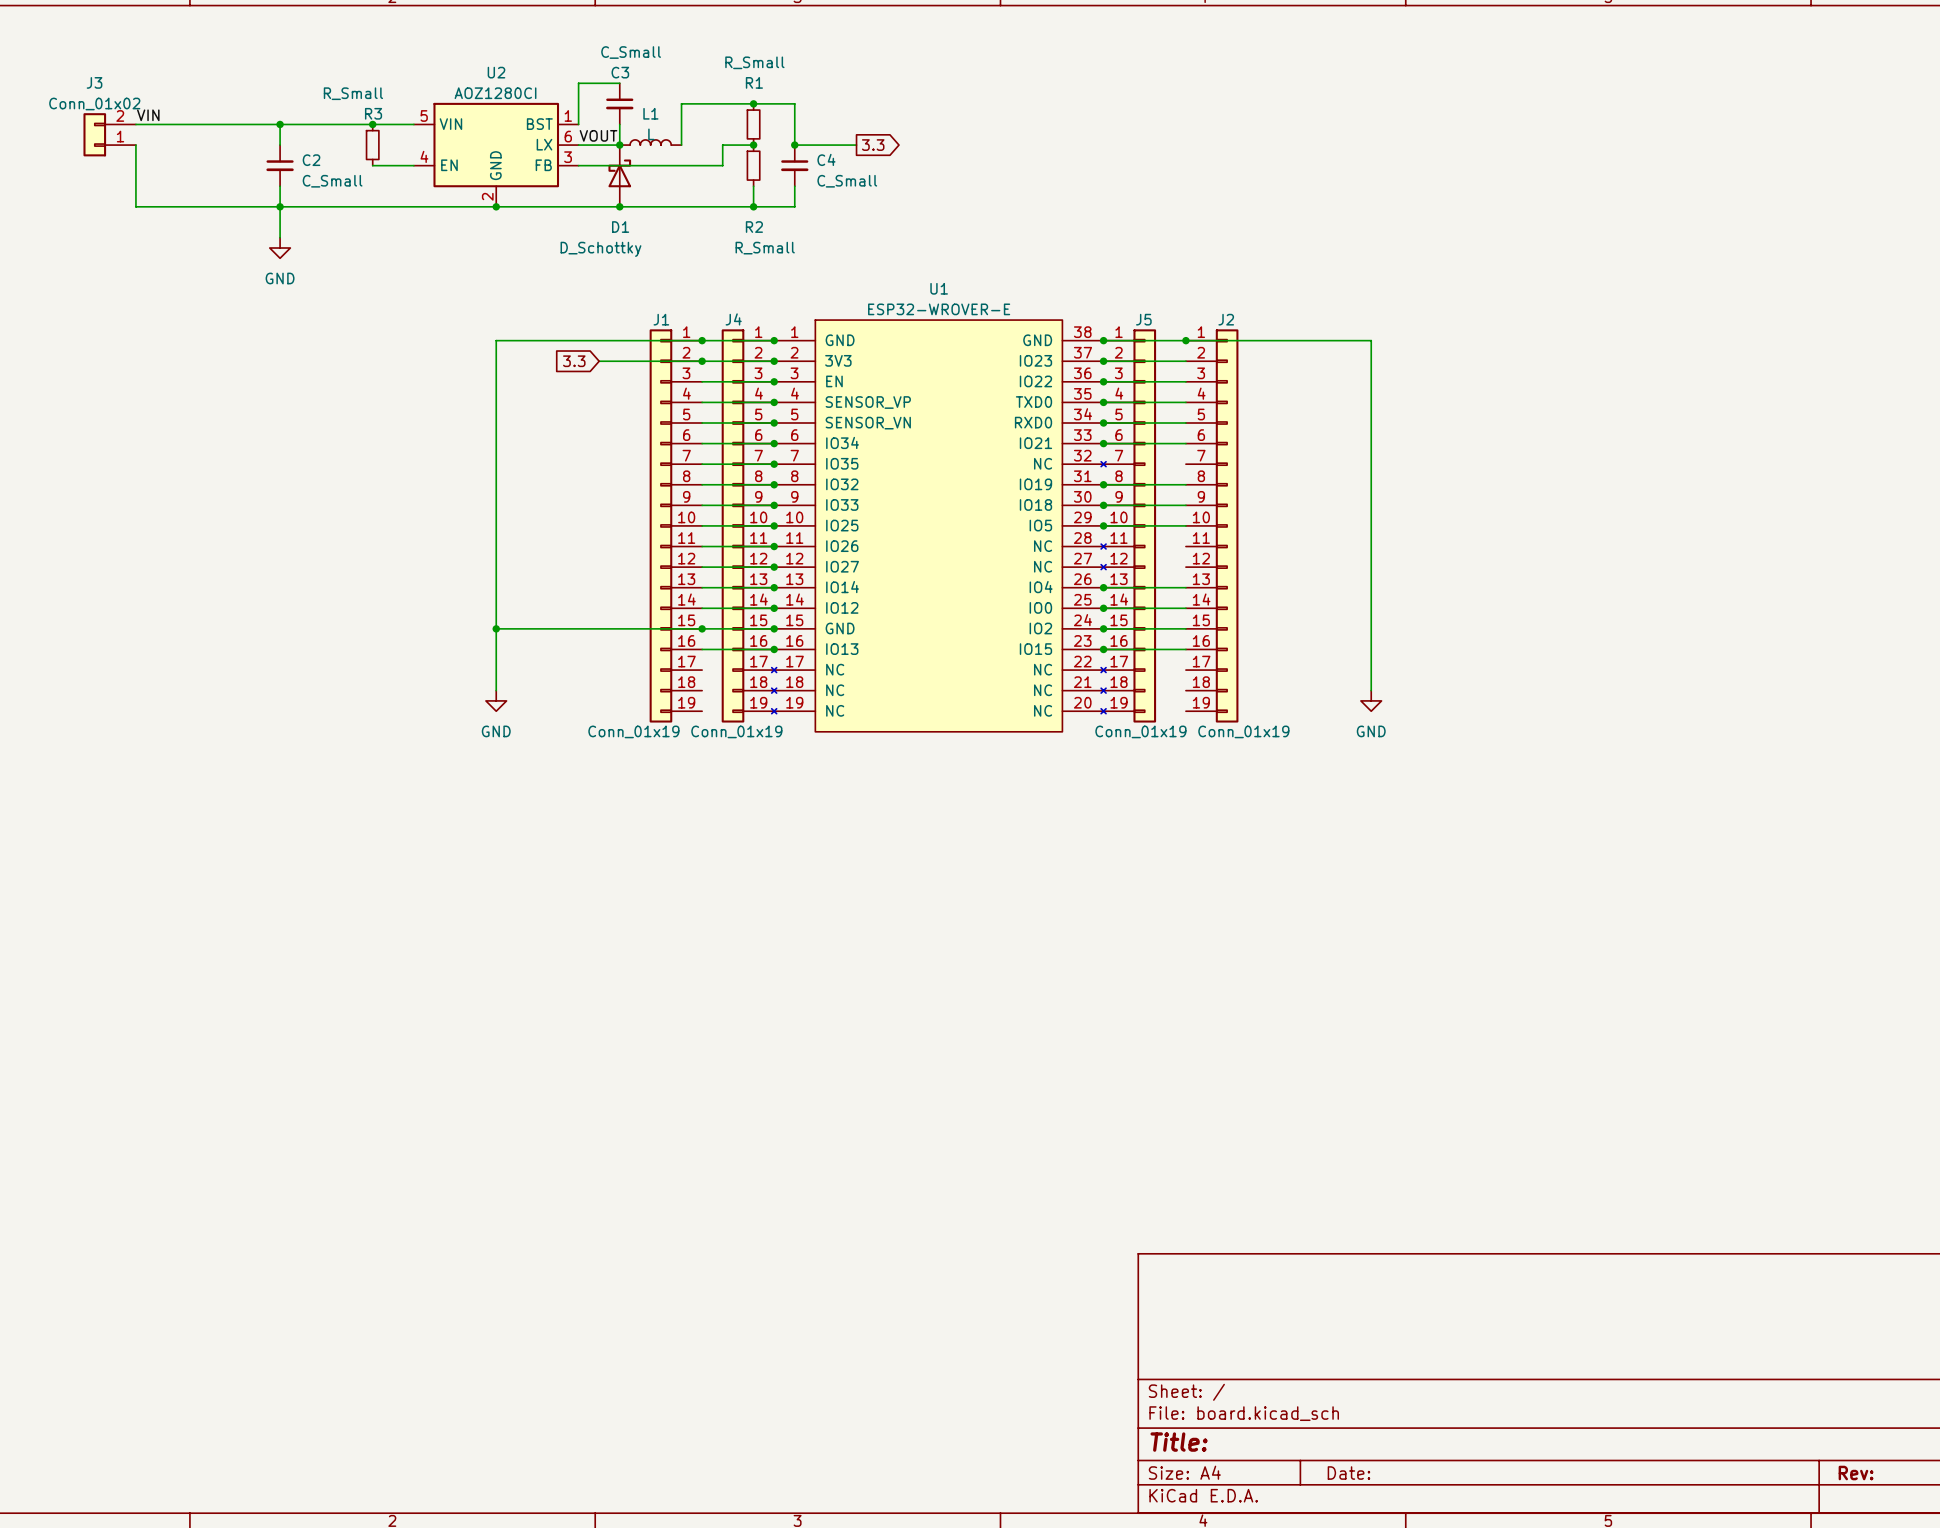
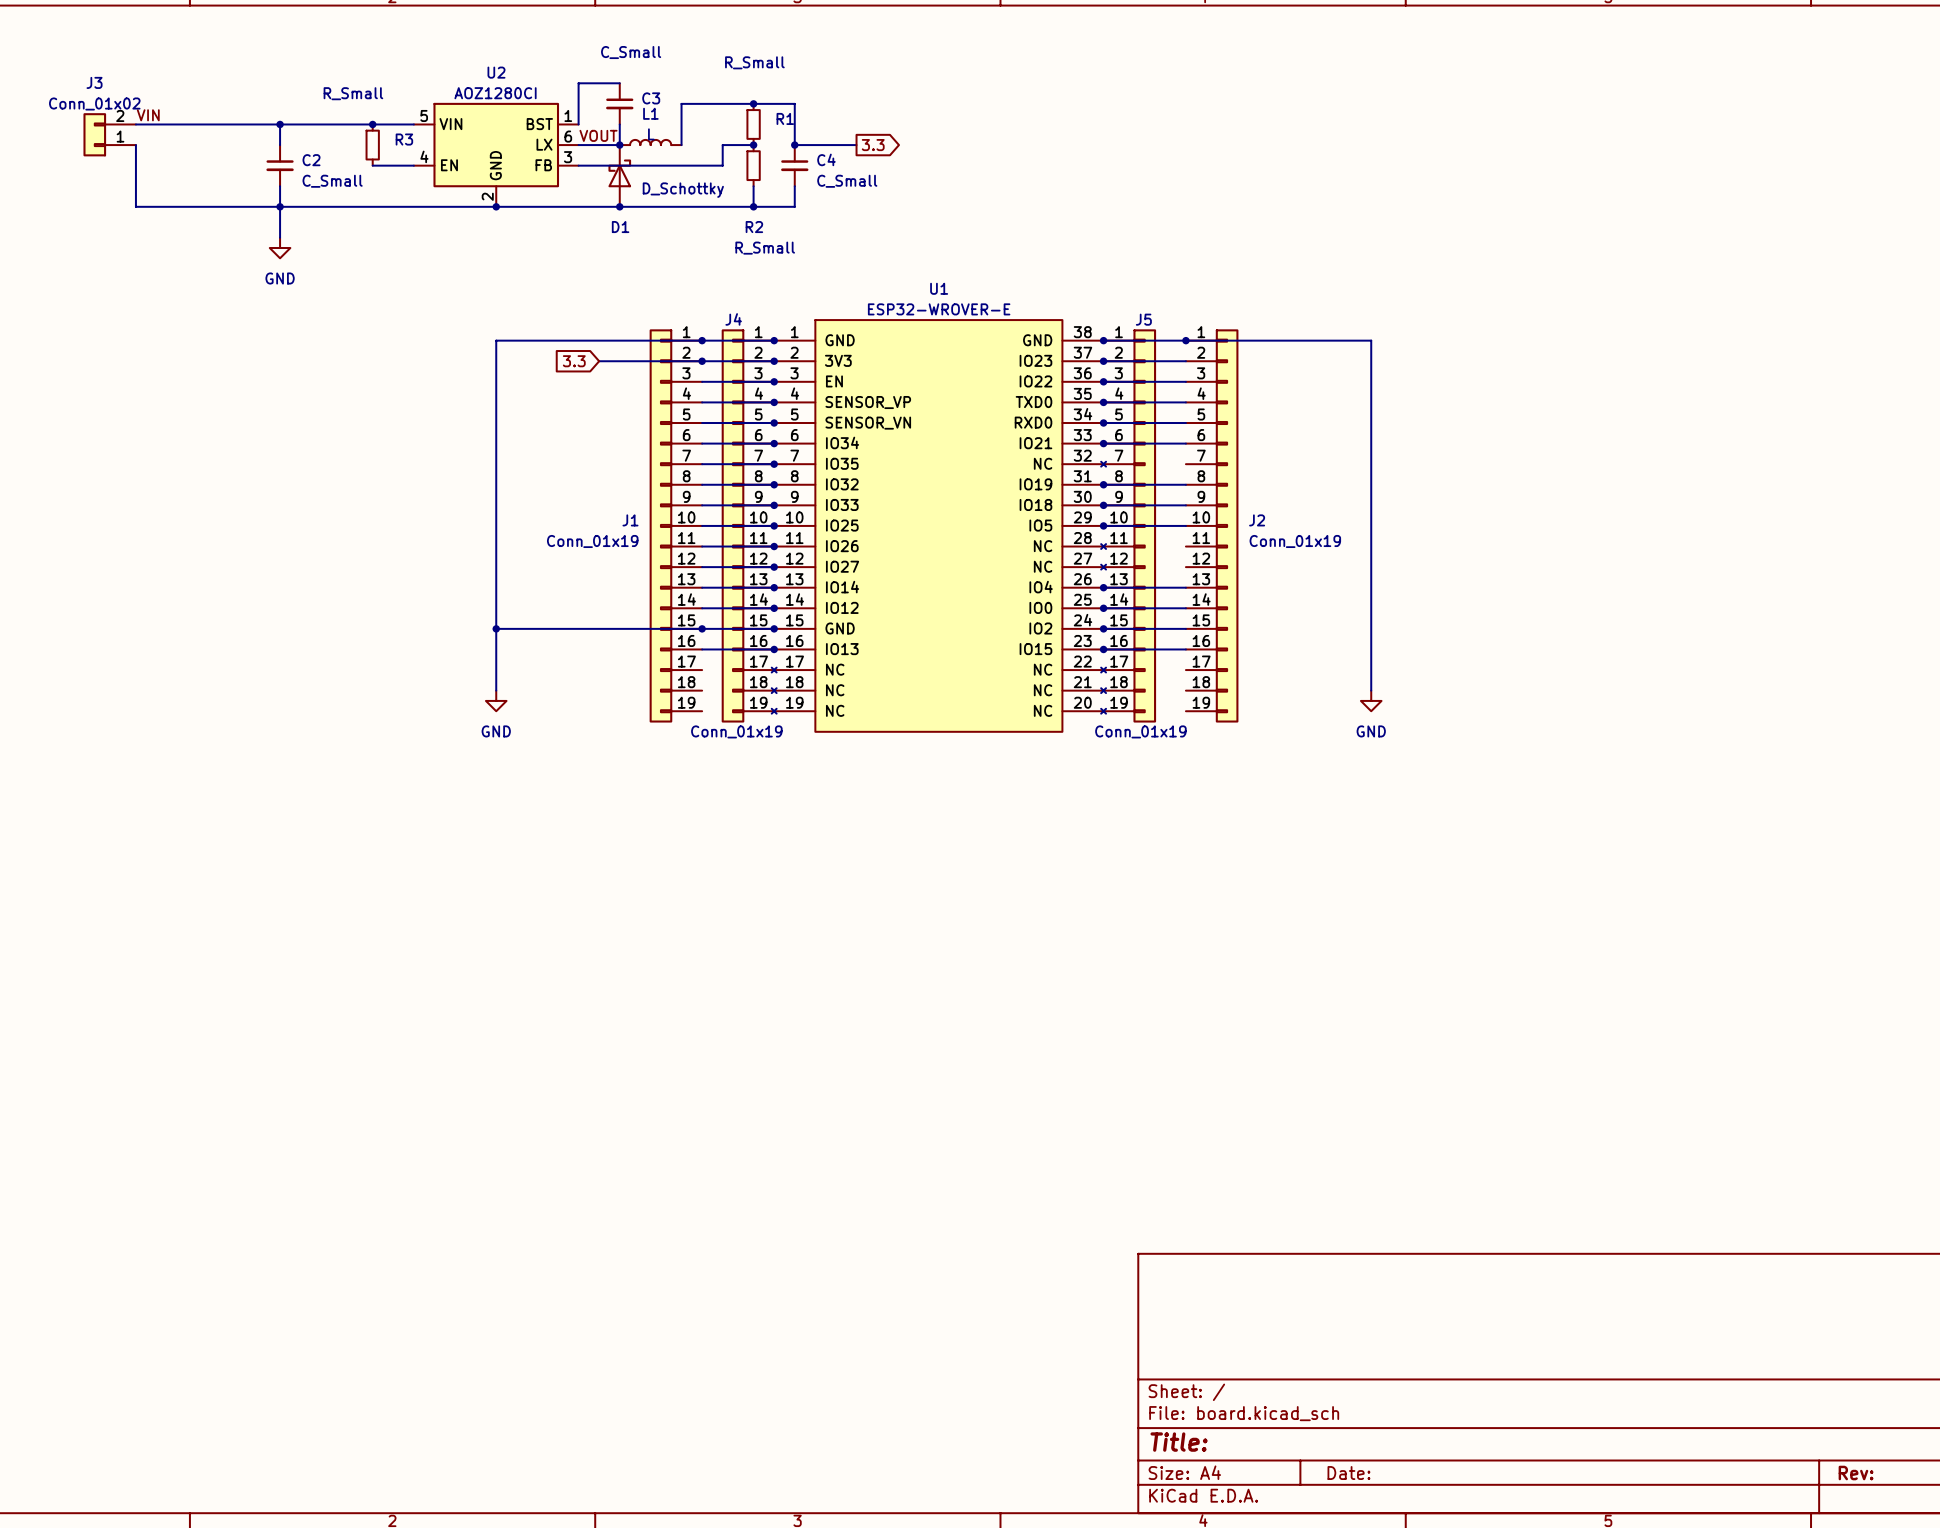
C3 name position: C3 (620, 72) -> C3 (651, 98)
R1 name position: R1 (754, 82) -> R1 (785, 118)
R3 name position: R3 (373, 113) -> R3 (404, 139)
D1 value position: D_Schottky (600, 249) -> D_Schottky (683, 190)
J1 name position: J1 (661, 319) -> J1 (630, 520)
J2 name position: J2 (1226, 319) -> J2 (1257, 520)
J1 value position: Conn_01x19 (633, 731) -> Conn_01x19 (592, 541)
J2 value position: Conn_01x19 (1243, 731) -> Conn_01x19 (1295, 541)

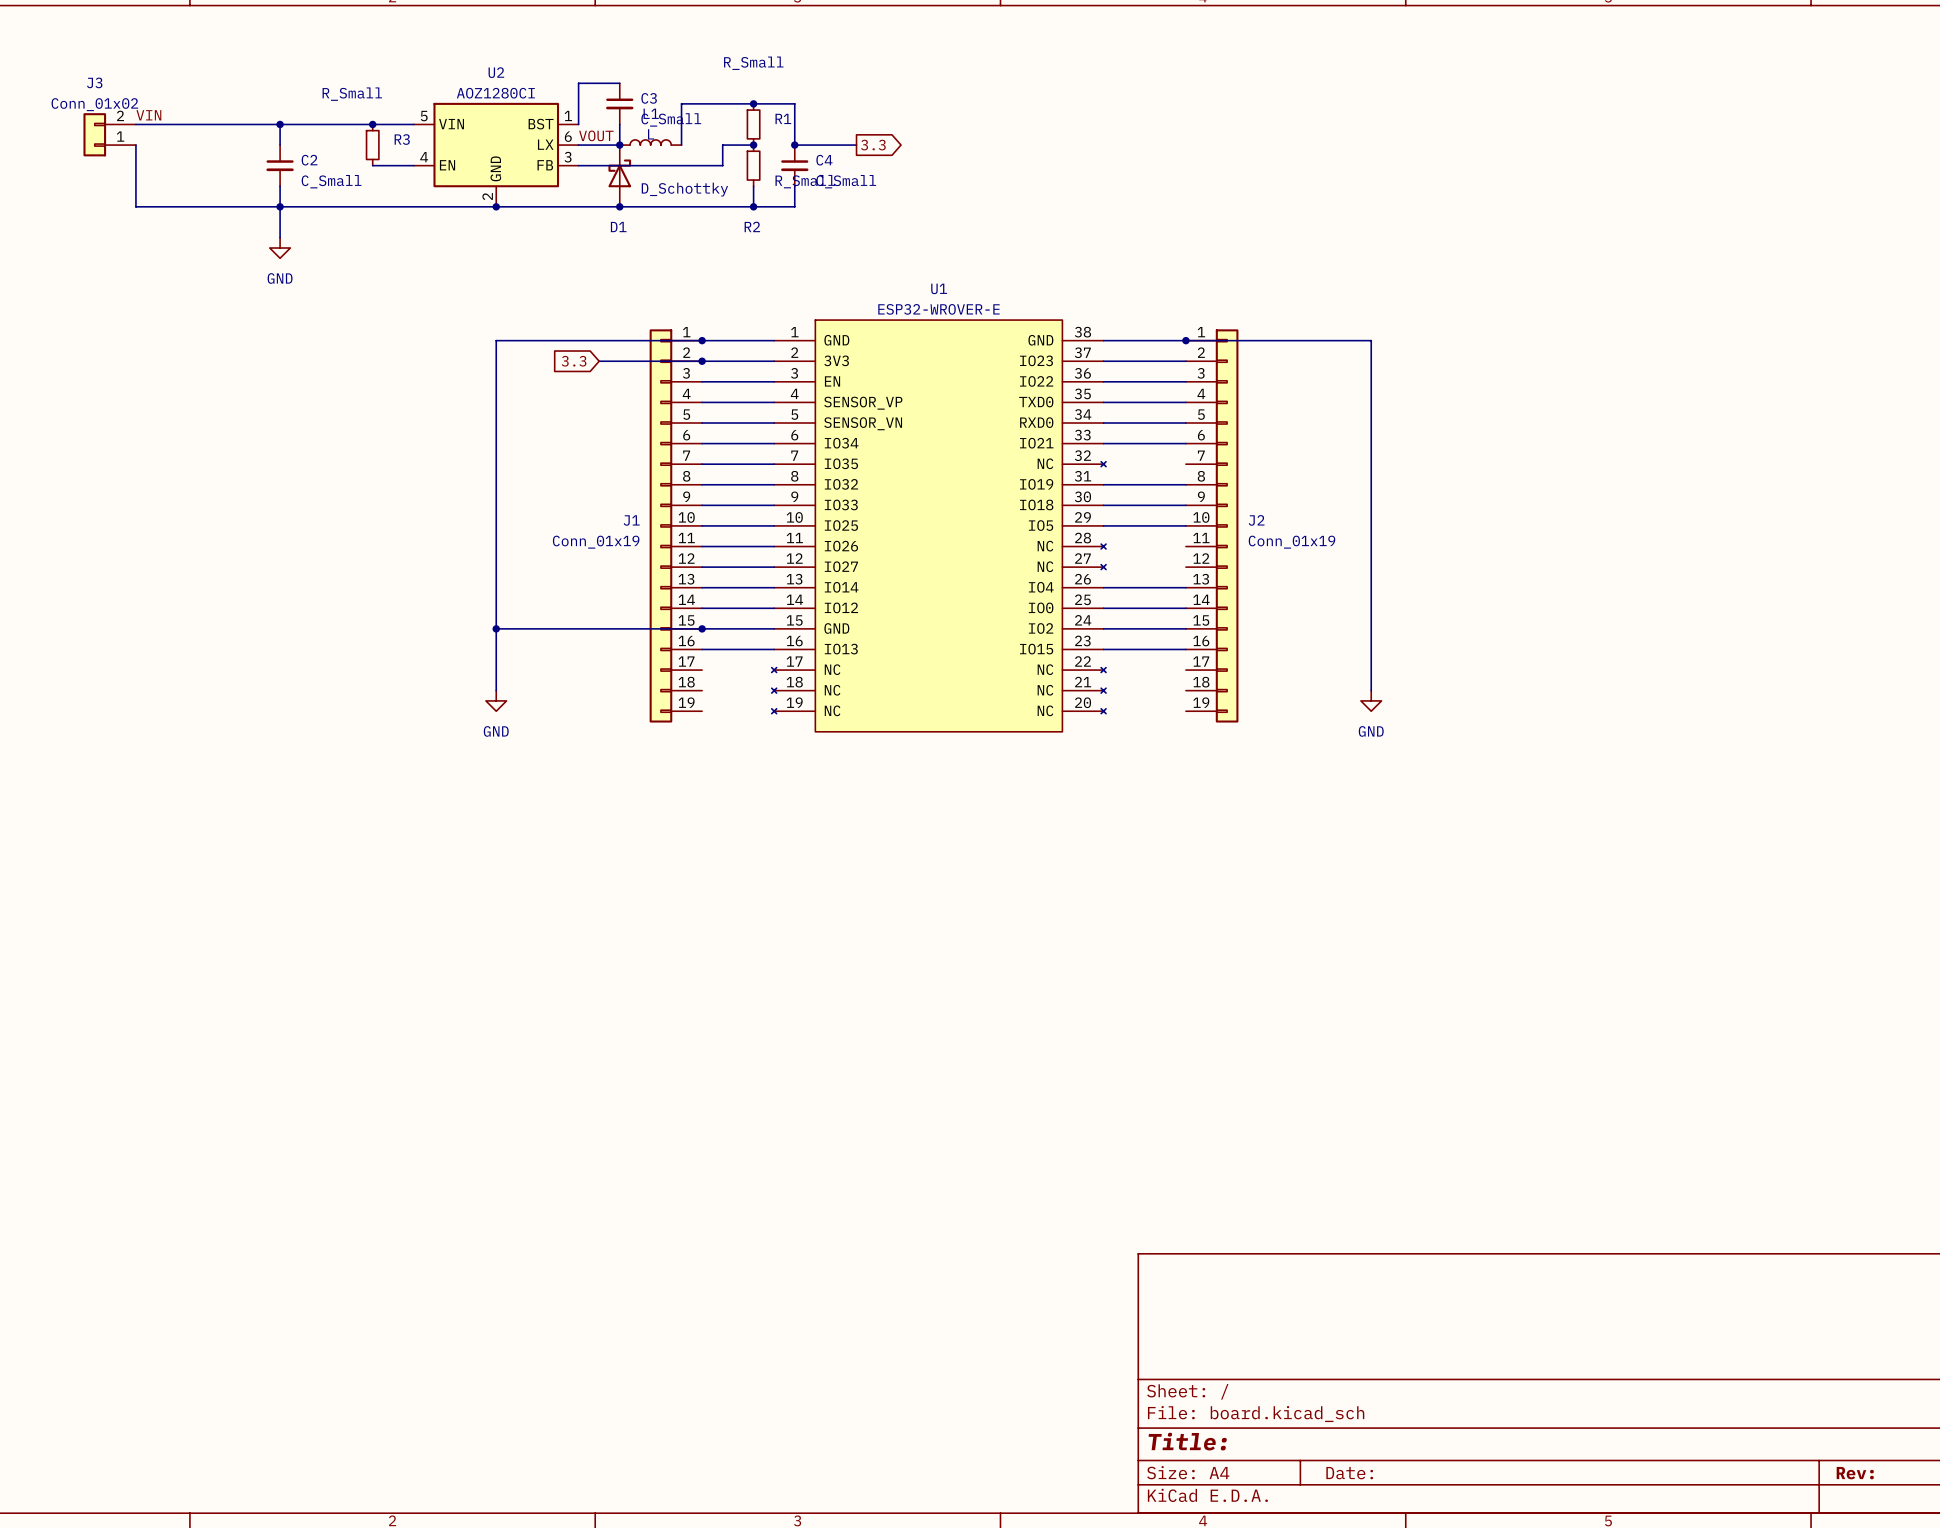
C3 value position: C_Small (631, 52) -> C_Small (671, 119)
R2 value position: R_Small (765, 248) -> R_Small (805, 181)
junction: (774, 340) -> none
junction: (1103, 340) -> none
junction: (774, 361) -> none
junction: (1103, 361) -> none
junction: (774, 381) -> none
junction: (1103, 381) -> none
junction: (774, 402) -> none
junction: (1103, 402) -> none
junction: (774, 423) -> none
junction: (1103, 423) -> none
junction: (774, 443) -> none
junction: (1103, 443) -> none
junction: (774, 464) -> none
junction: (774, 484) -> none
junction: (1103, 484) -> none
junction: (774, 505) -> none
junction: (1103, 505) -> none
J4: Conn_01x19 (747, 525) -> none
junction: (774, 525) -> none
junction: (1103, 525) -> none
J5: Conn_01x19 (1129, 525) -> none
junction: (774, 546) -> none
junction: (774, 567) -> none
junction: (774, 587) -> none
junction: (1103, 587) -> none
junction: (774, 608) -> none
junction: (1103, 608) -> none
junction: (774, 628) -> none
junction: (1103, 628) -> none
junction: (774, 649) -> none
junction: (1103, 649) -> none

